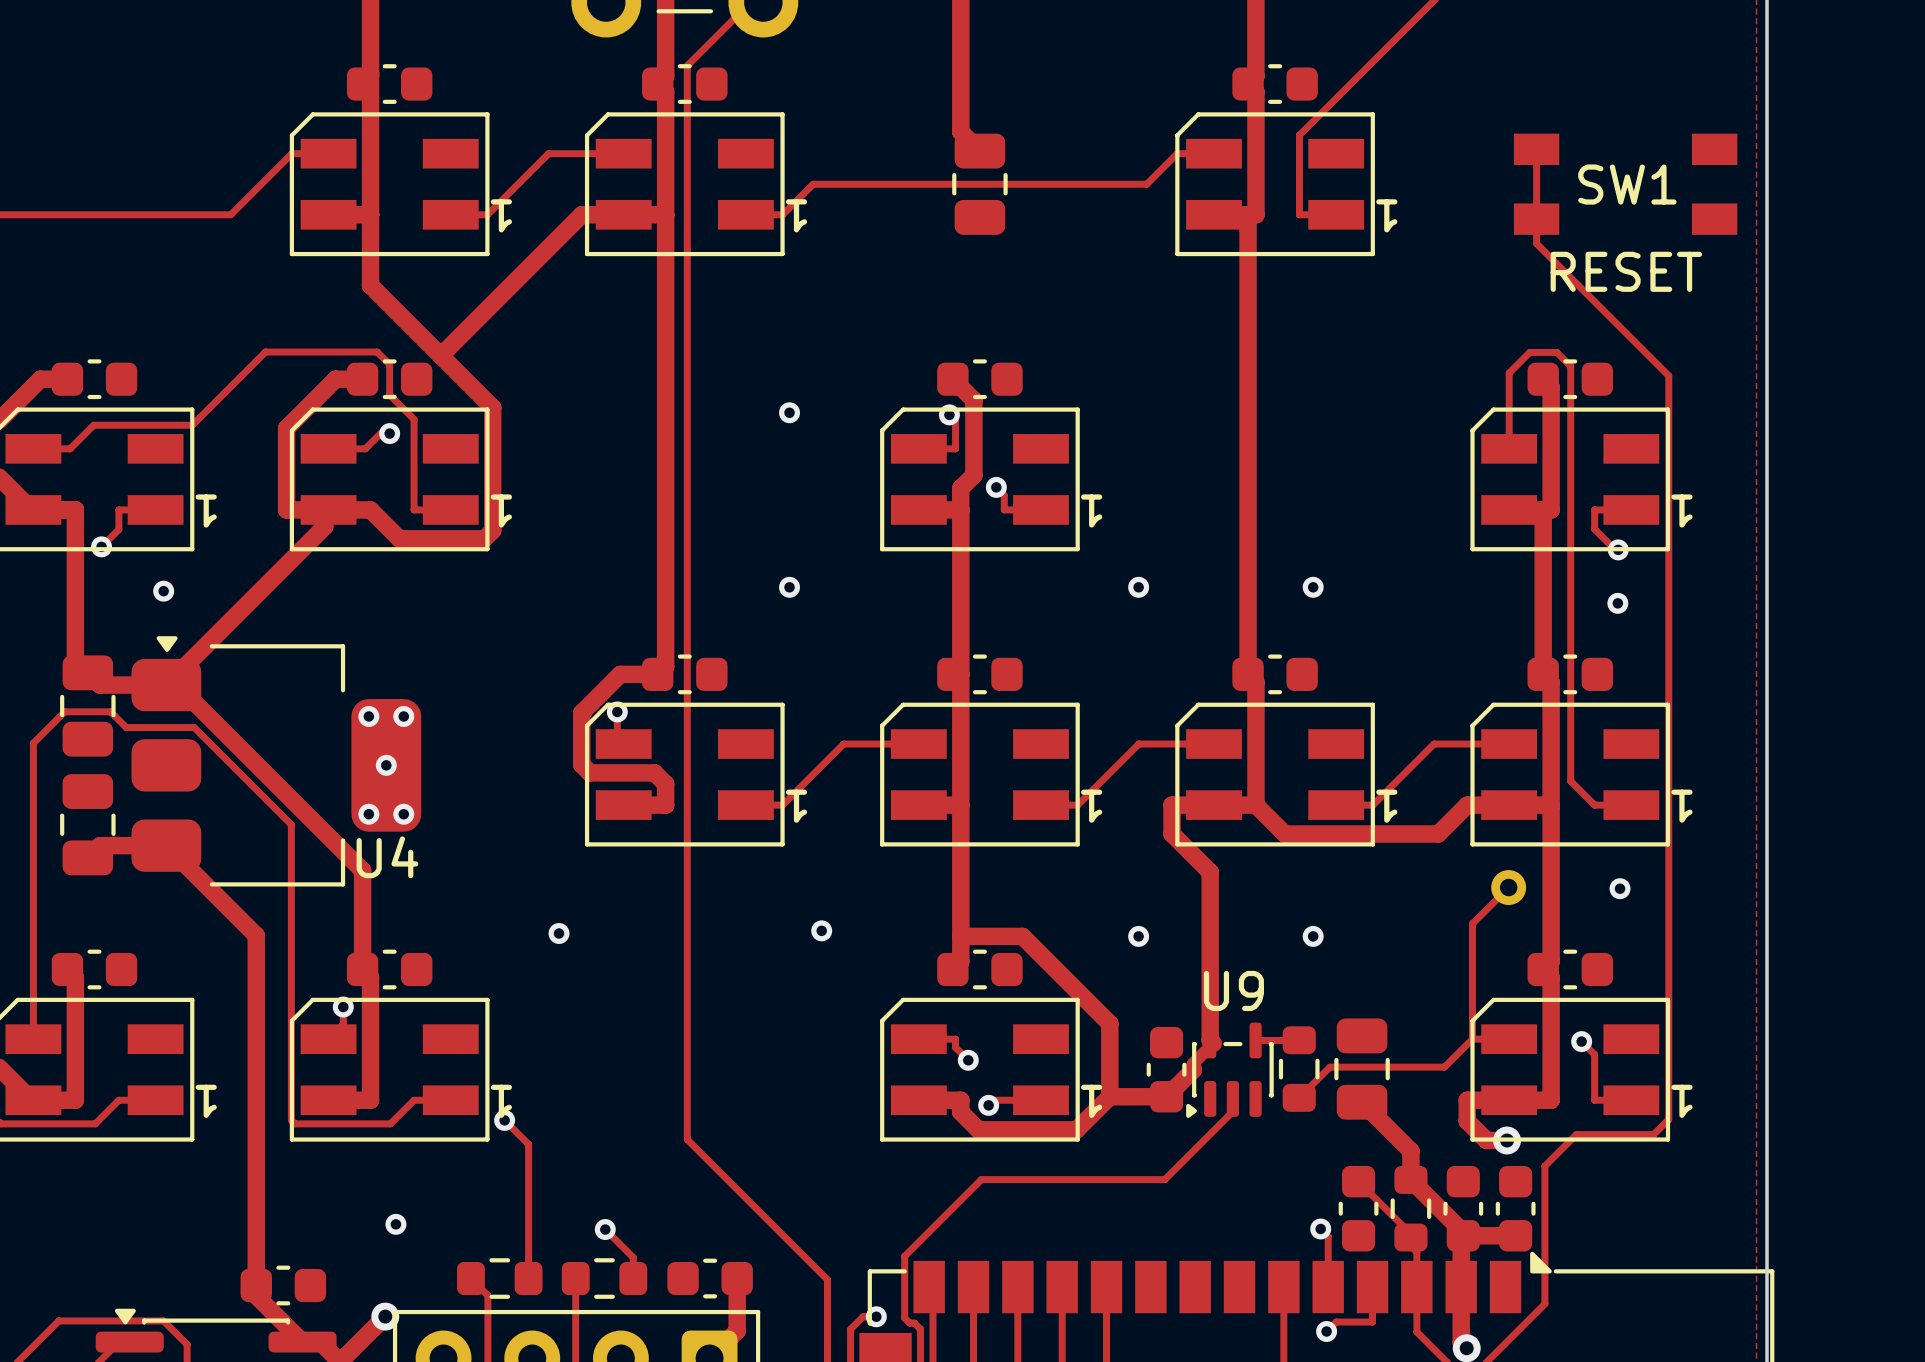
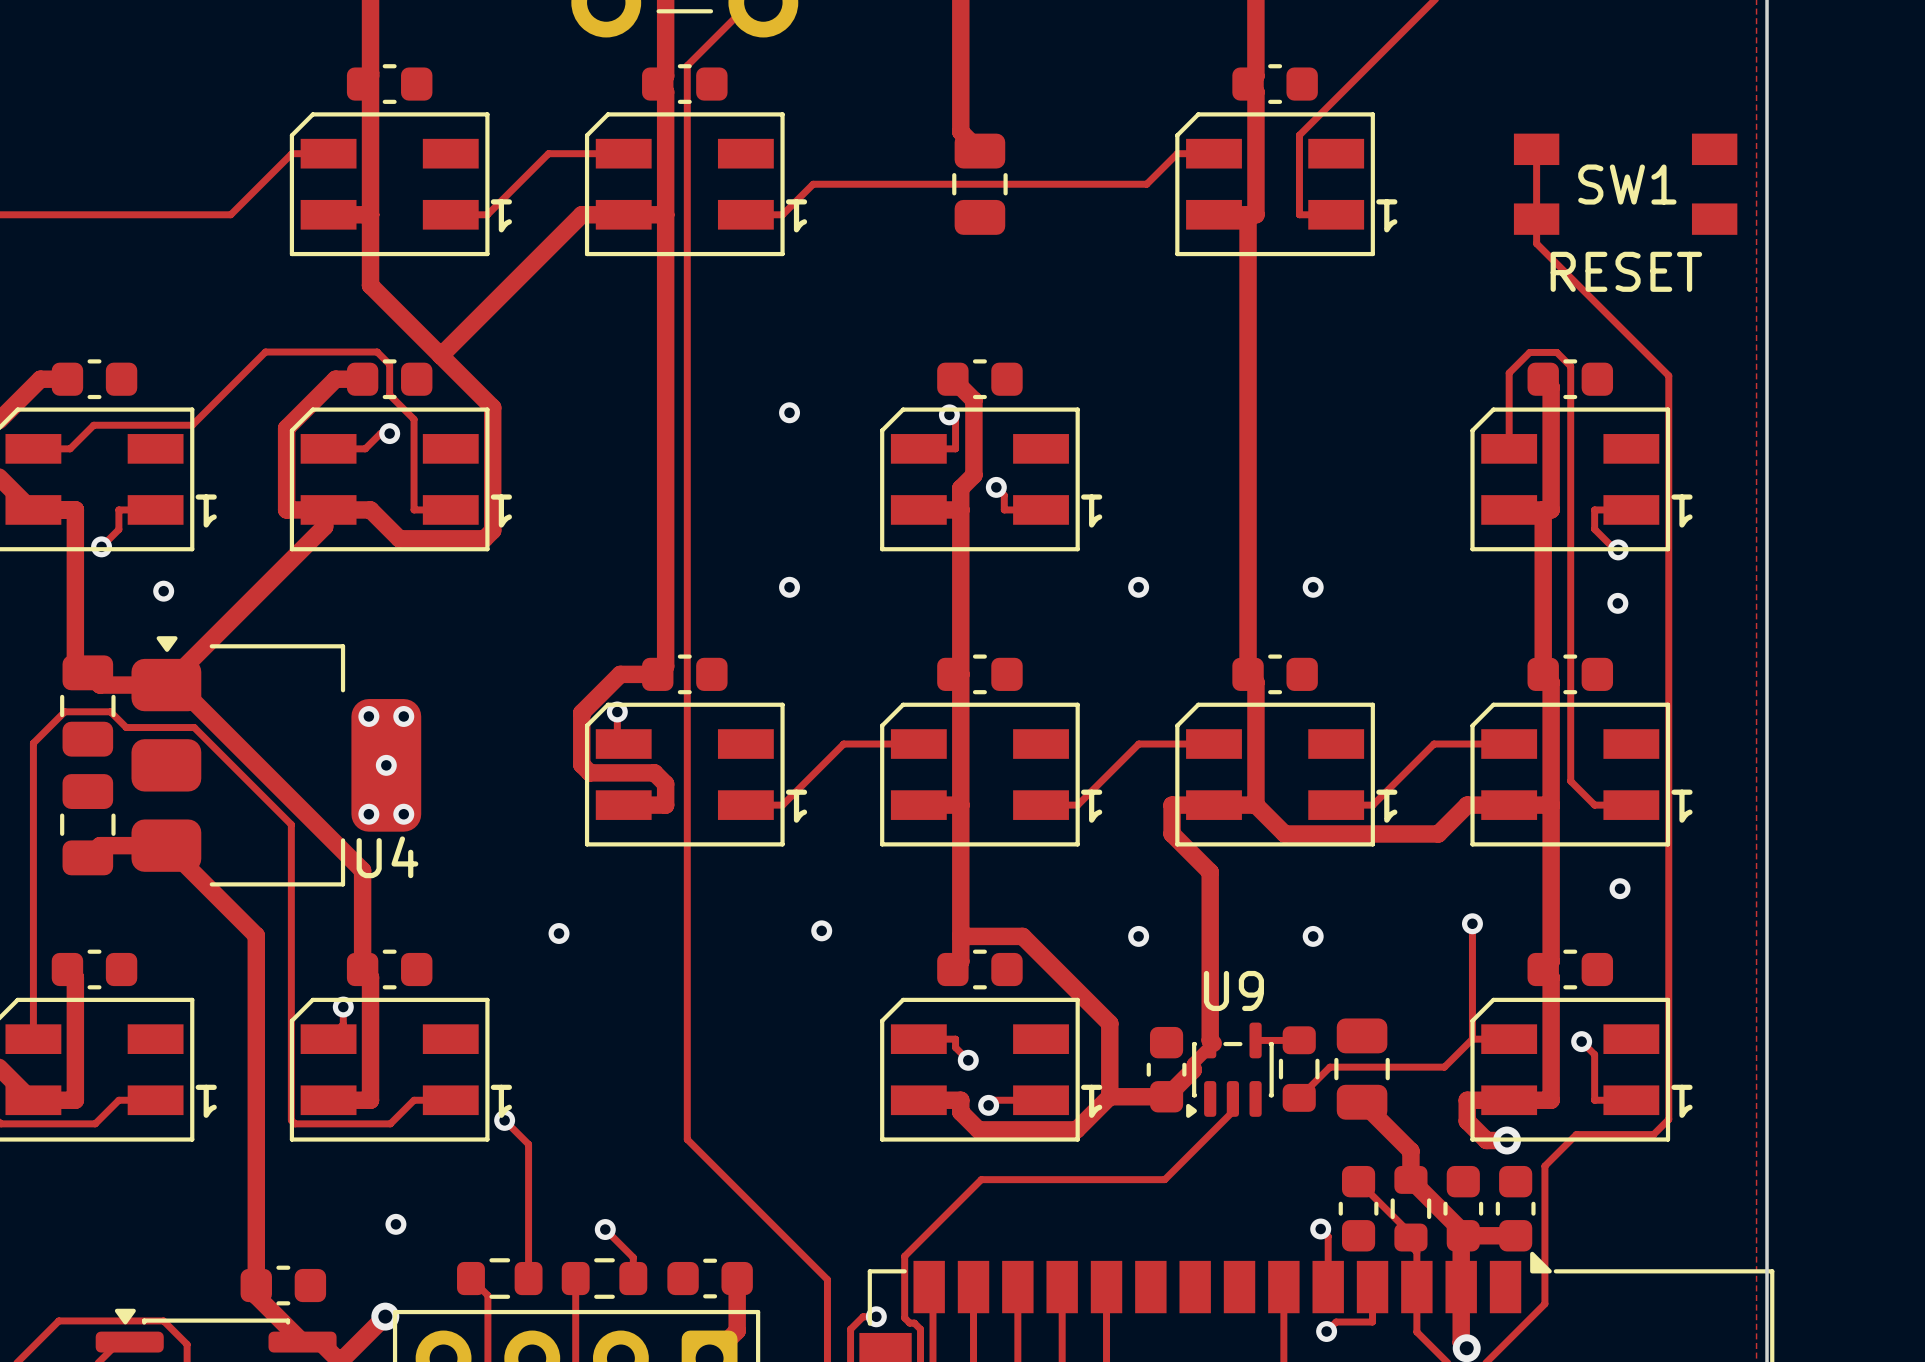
track: (1508, 887) (1472, 923) -> none
part: (1508, 887) -> none
via: none -> (1472, 923)

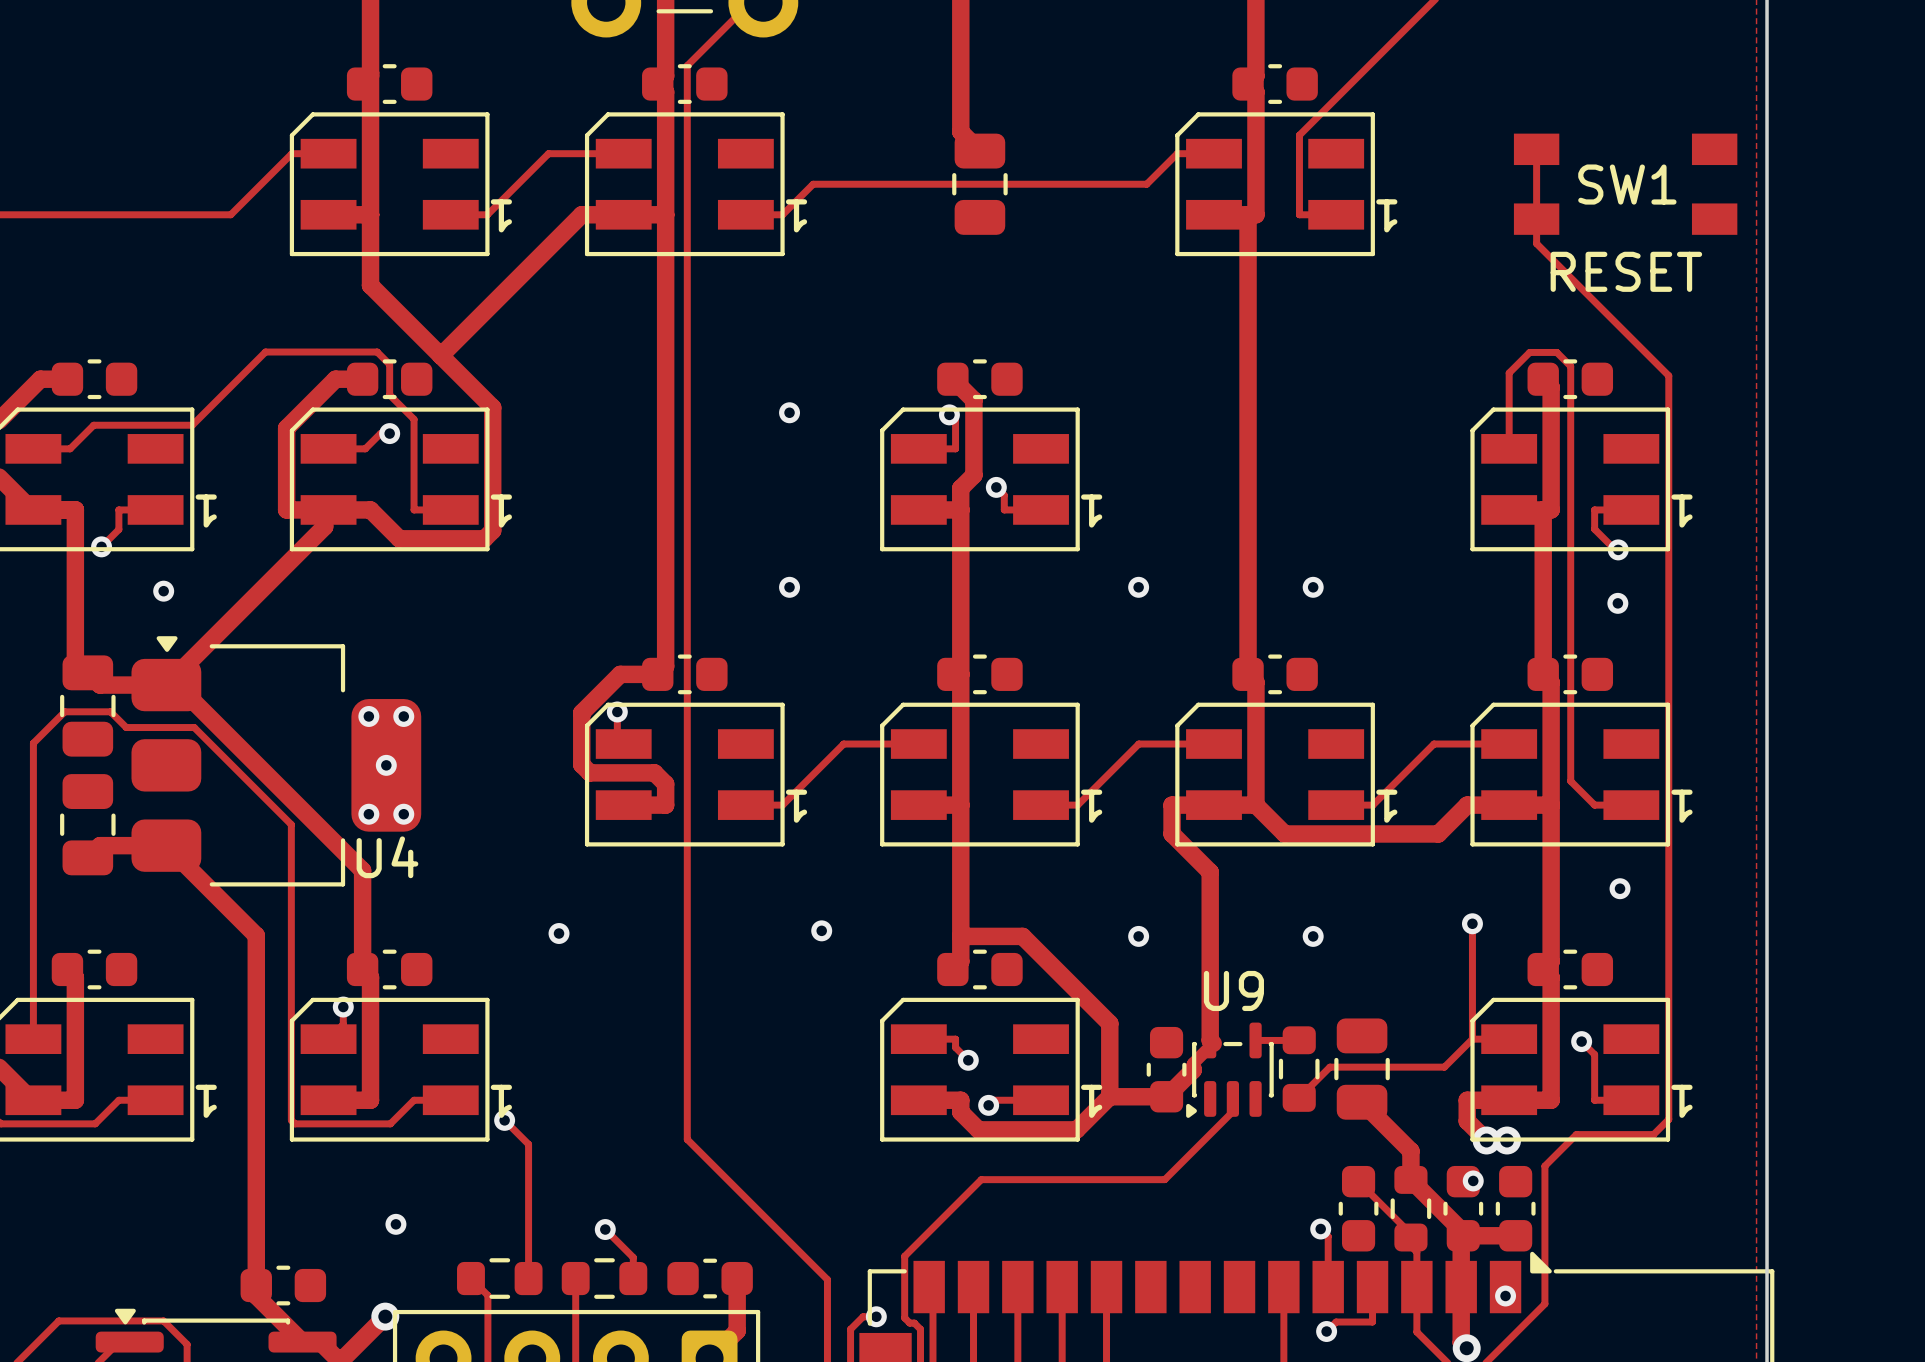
via: none -> (1486, 1140)
via: none -> (1473, 1180)
via: none -> (1505, 1295)

